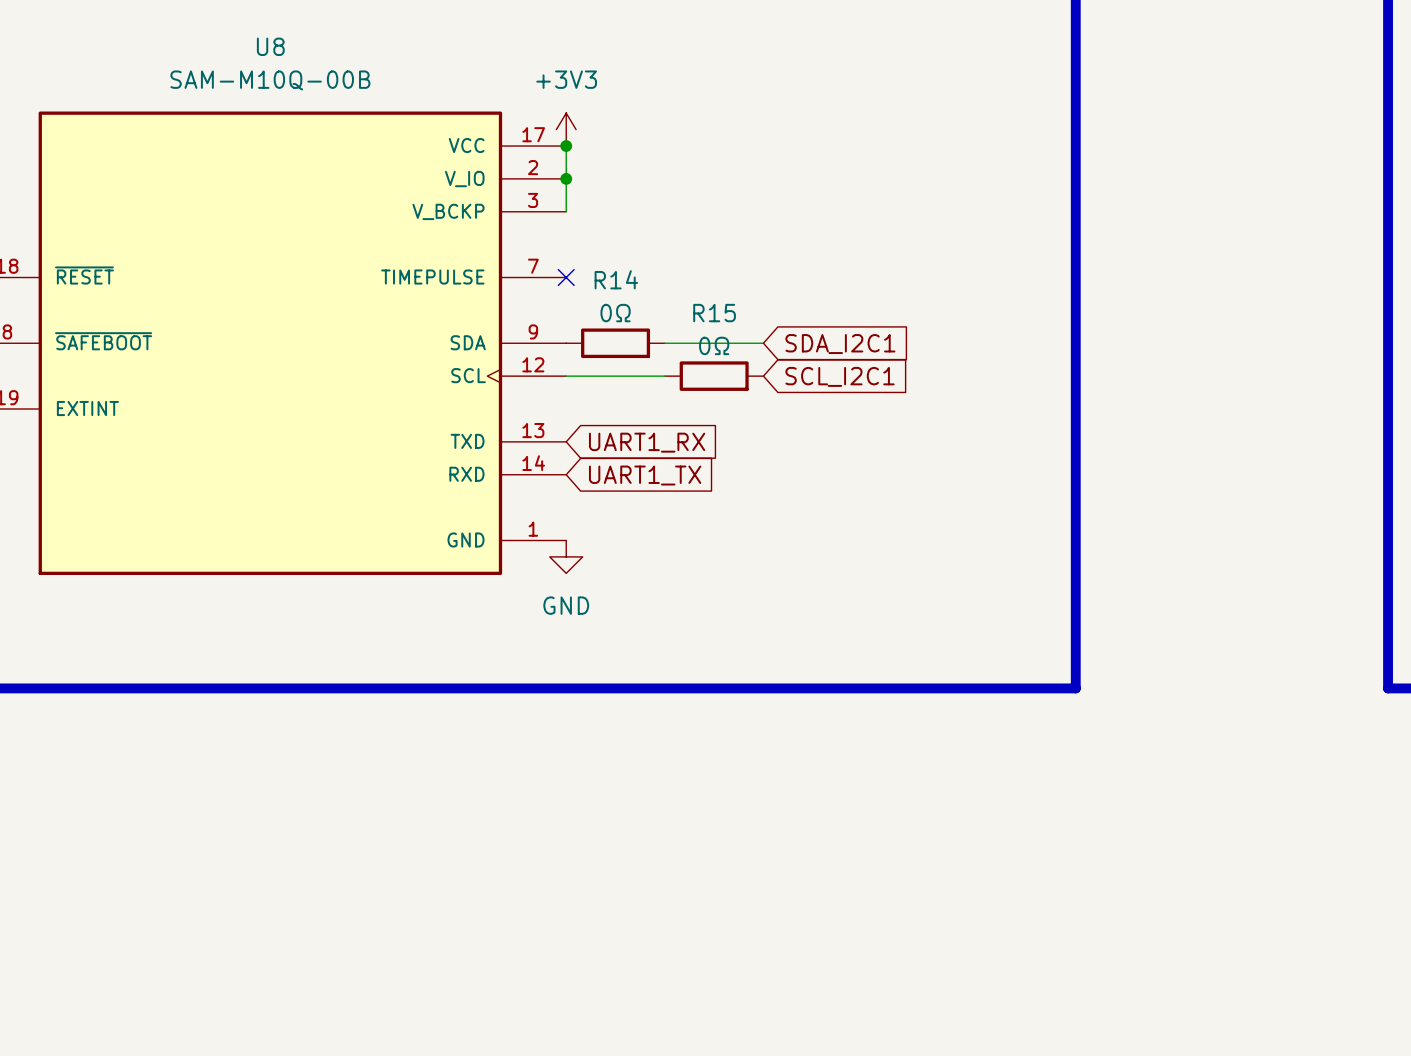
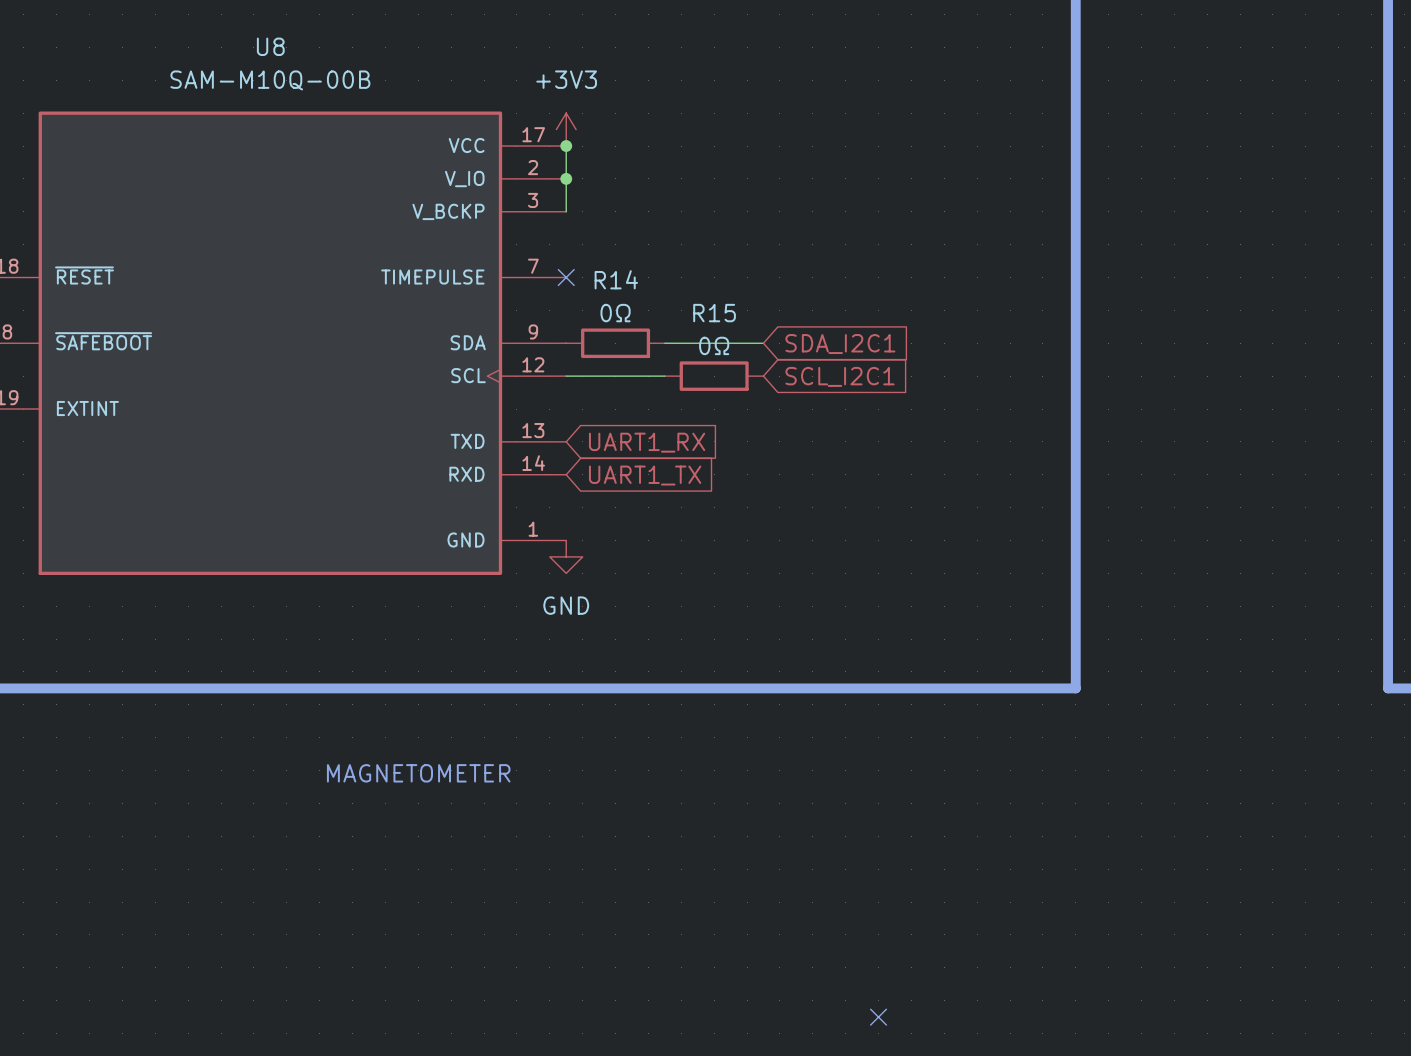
text: none -> MAGNETOMETER (418, 773)
no-connect mark: none -> (878, 1017)

